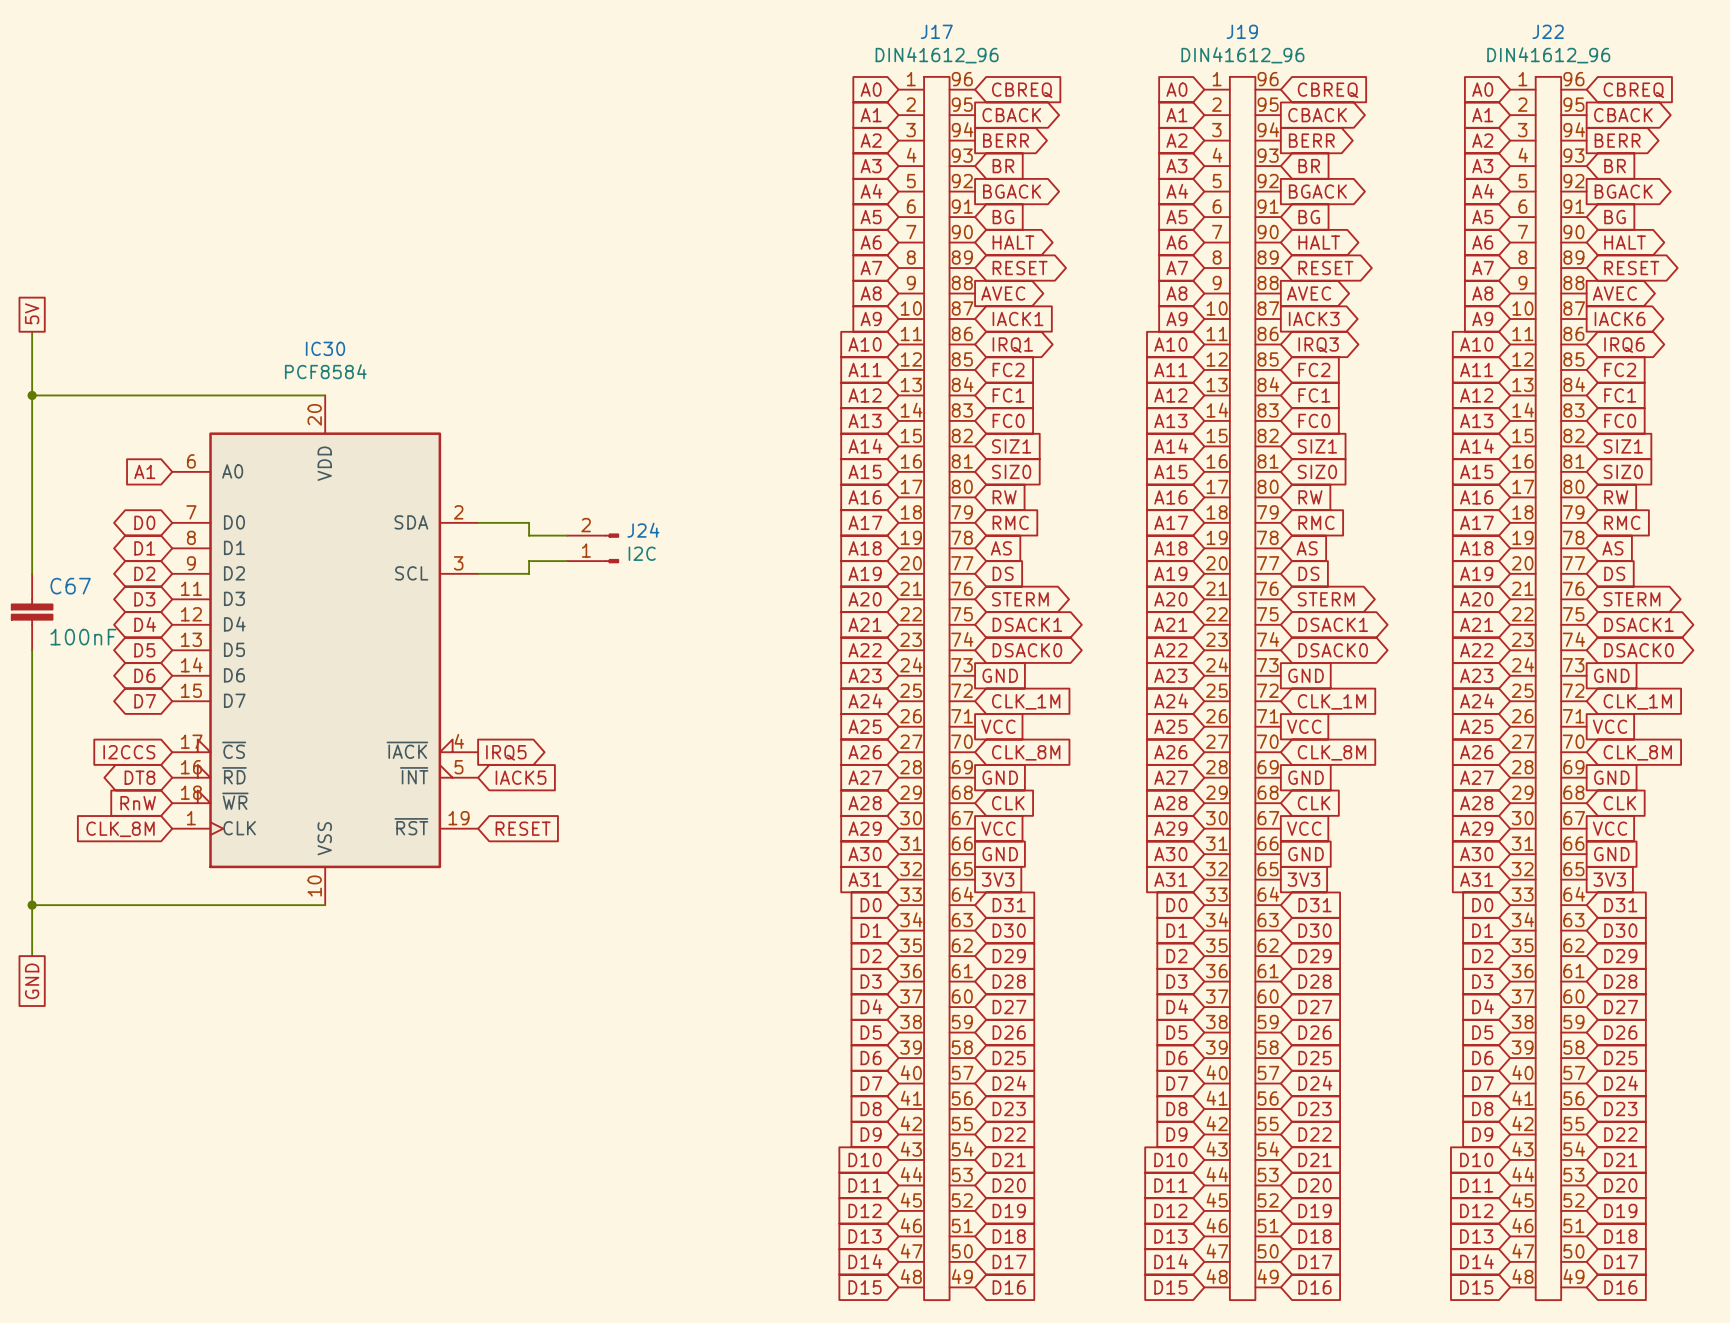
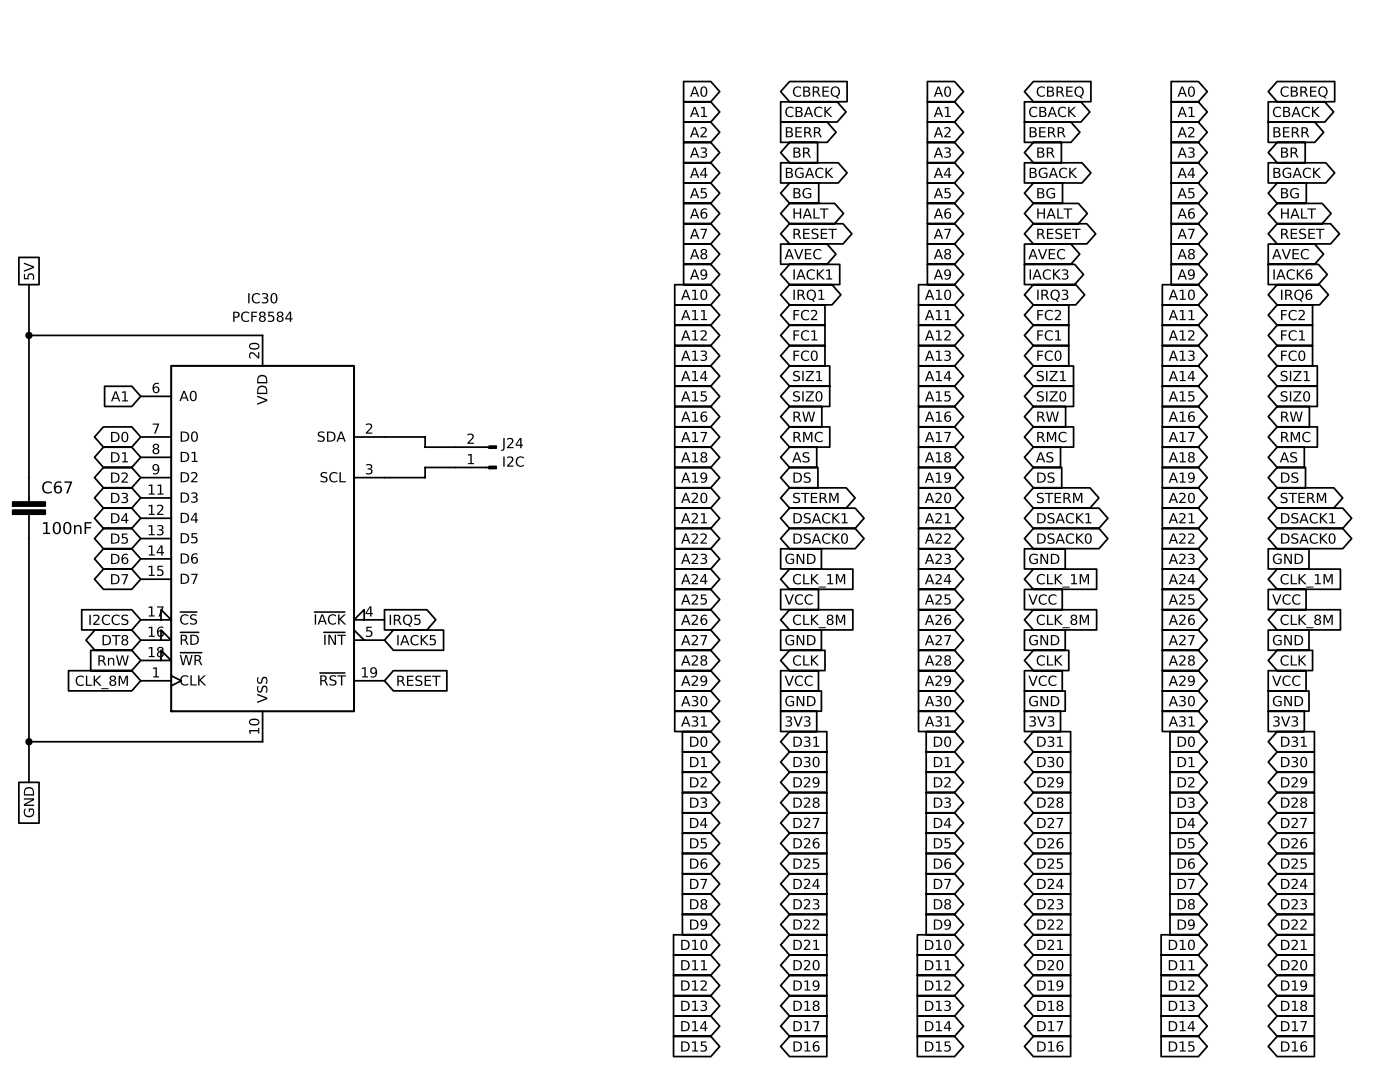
J17: DIN41612_96 (936, 688) -> none
J19: DIN41612_96 (1242, 688) -> none
J22: DIN41612_96 (1548, 688) -> none

